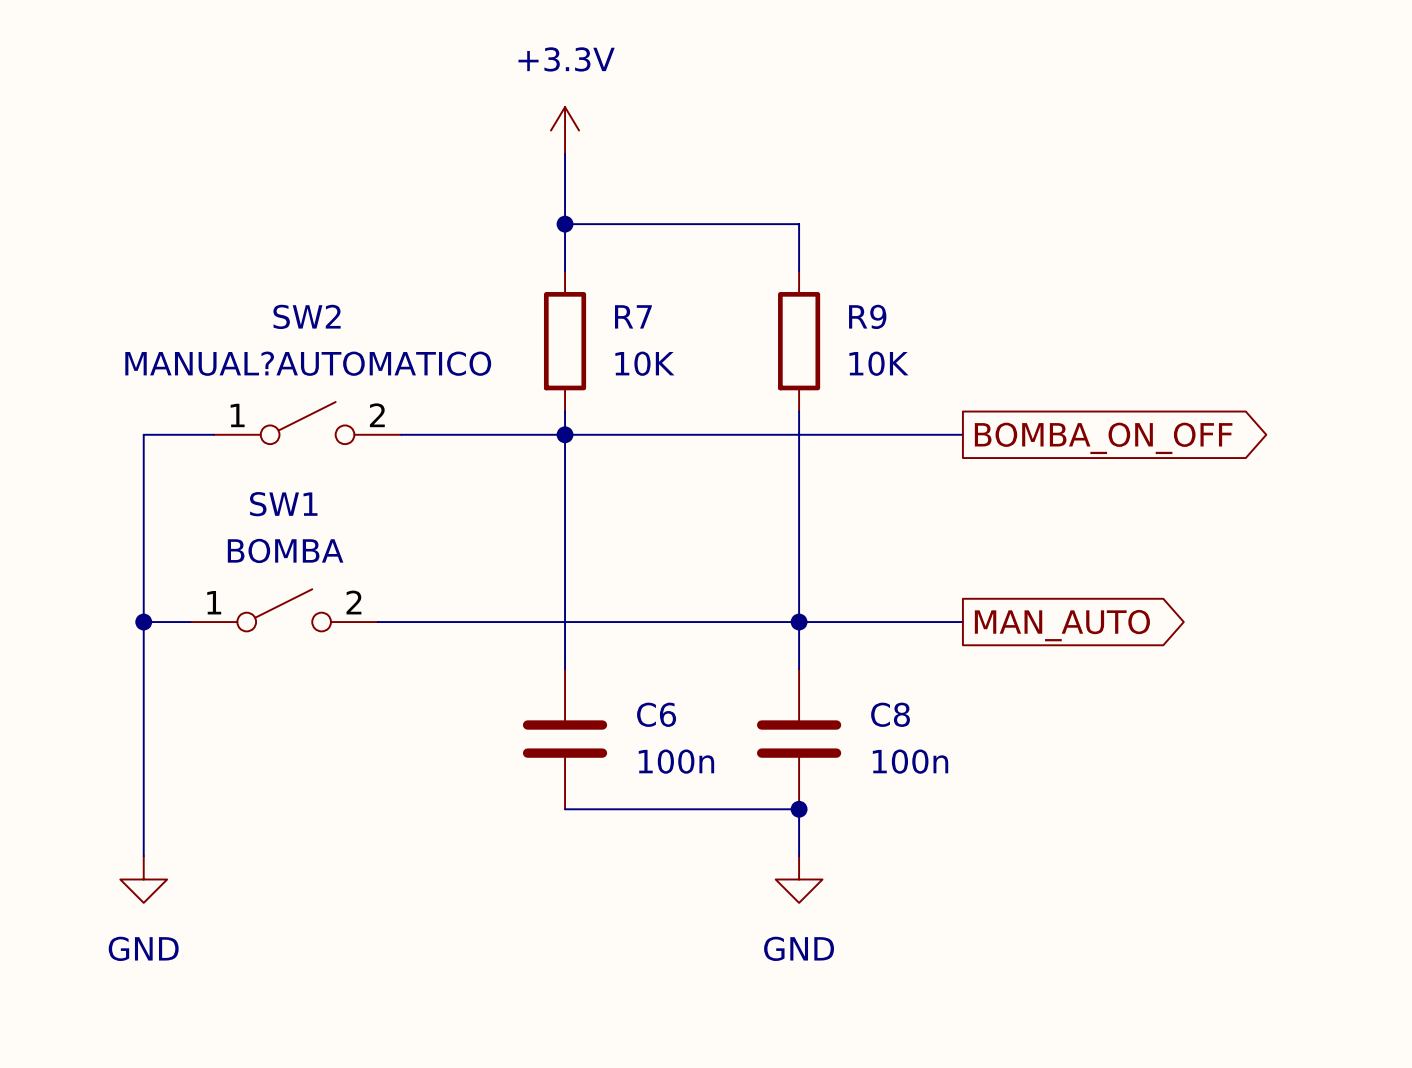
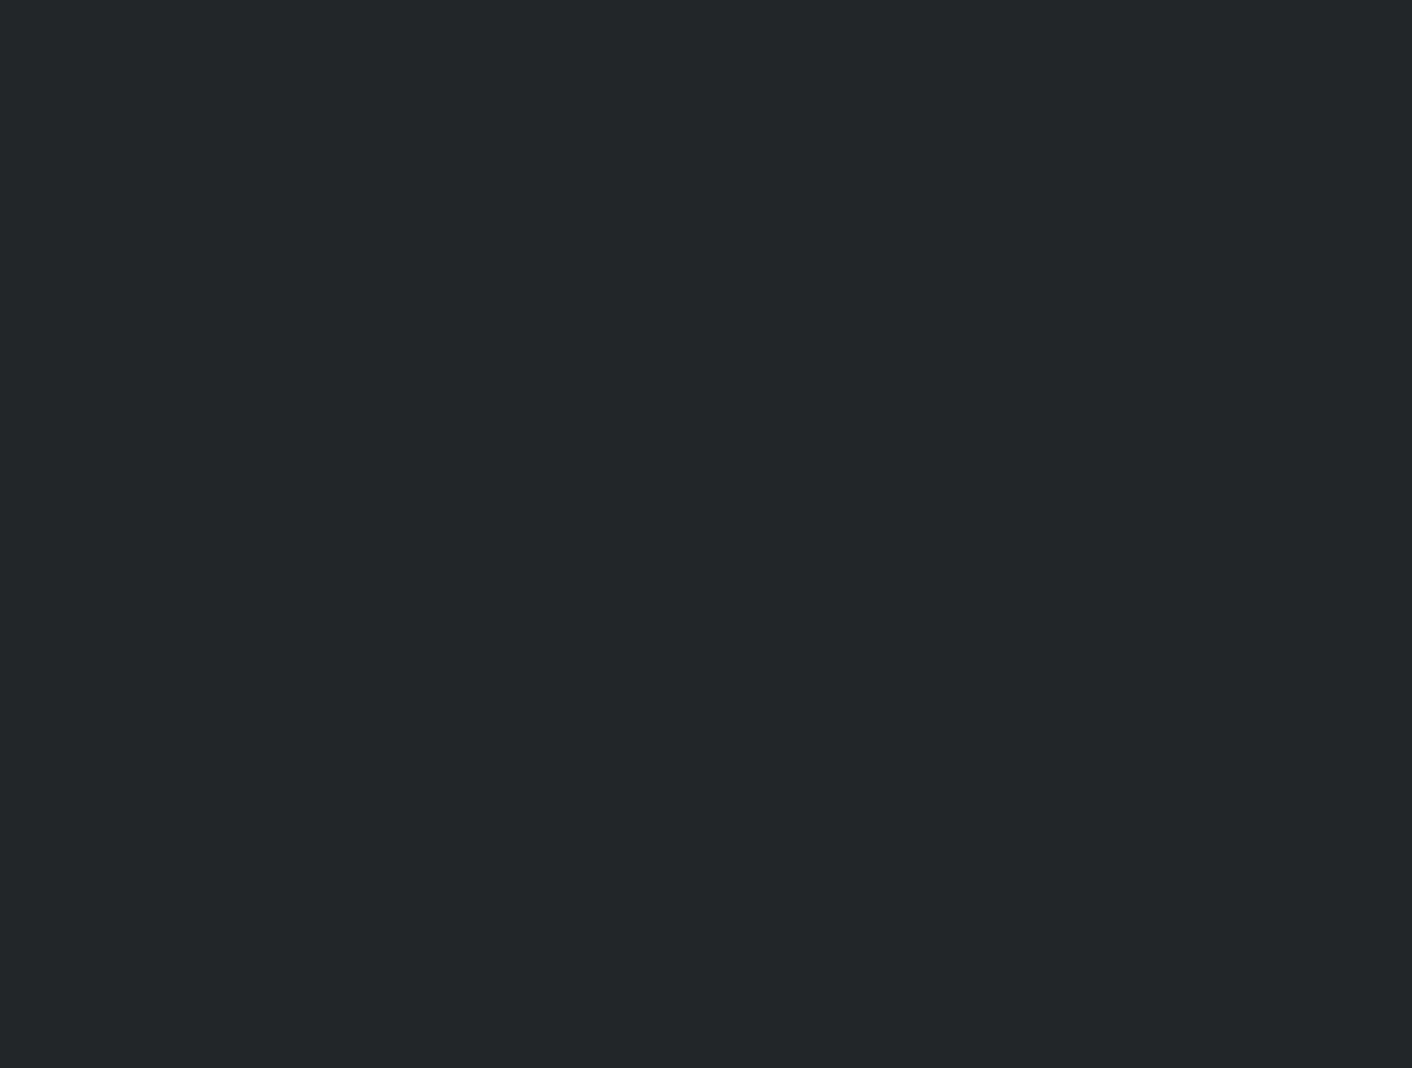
power symbol: +3.3V (565, 130) -> none
wire: (565, 153) (565, 270) -> none
wire: (565, 224) (799, 224) (799, 270) -> none
junction: (565, 224) -> none
R7: 10K (565, 341) -> none
R9: 10K (799, 341) -> none
wire: (565, 411) (565, 668) -> none
wire: (799, 411) (799, 668) -> none
SW2: MANUAL?AUTOMATICO (307, 423) -> none
wire: (213, 434) (143, 434) (143, 856) -> none
wire: (401, 434) (962, 434) -> none
junction: (565, 434) -> none
global label: BOMBA_ON_OFF (1103, 438) -> none
SW1: BOMBA (284, 610) -> none
wire: (143, 622) (190, 622) -> none
junction: (143, 622) -> none
wire: (377, 622) (962, 622) -> none
junction: (799, 622) -> none
global label: MAN_AUTO (1062, 625) -> none
C6: 100n (565, 739) -> none
C8: 100n (799, 739) -> none
wire: (565, 809) (799, 809) (799, 856) -> none
junction: (799, 809) -> none
power symbol: GND (143, 879) -> none
power symbol: GND (799, 879) -> none

